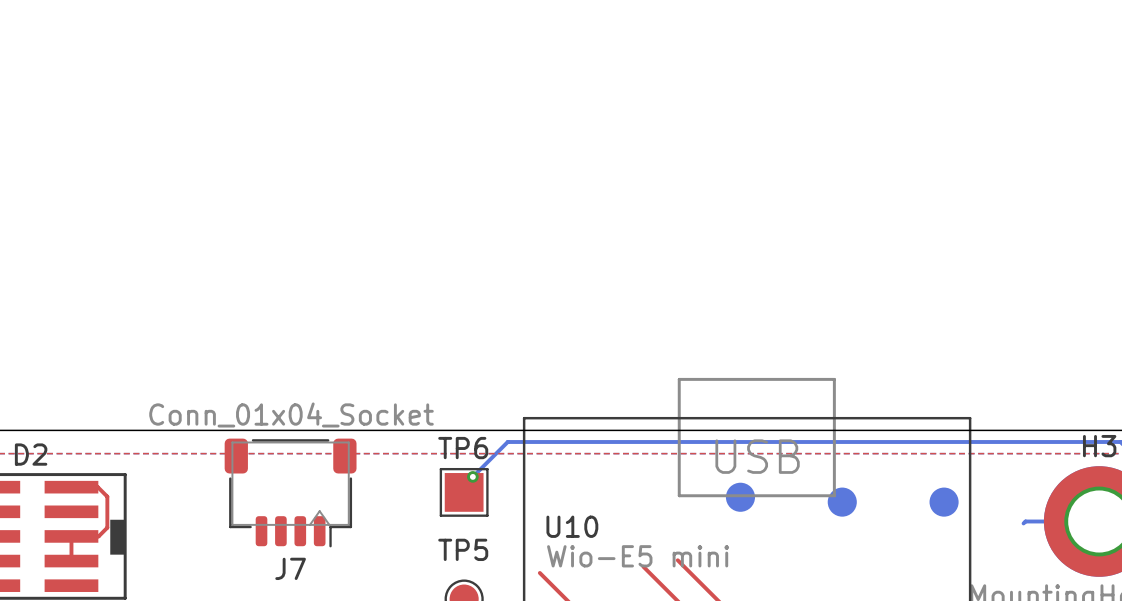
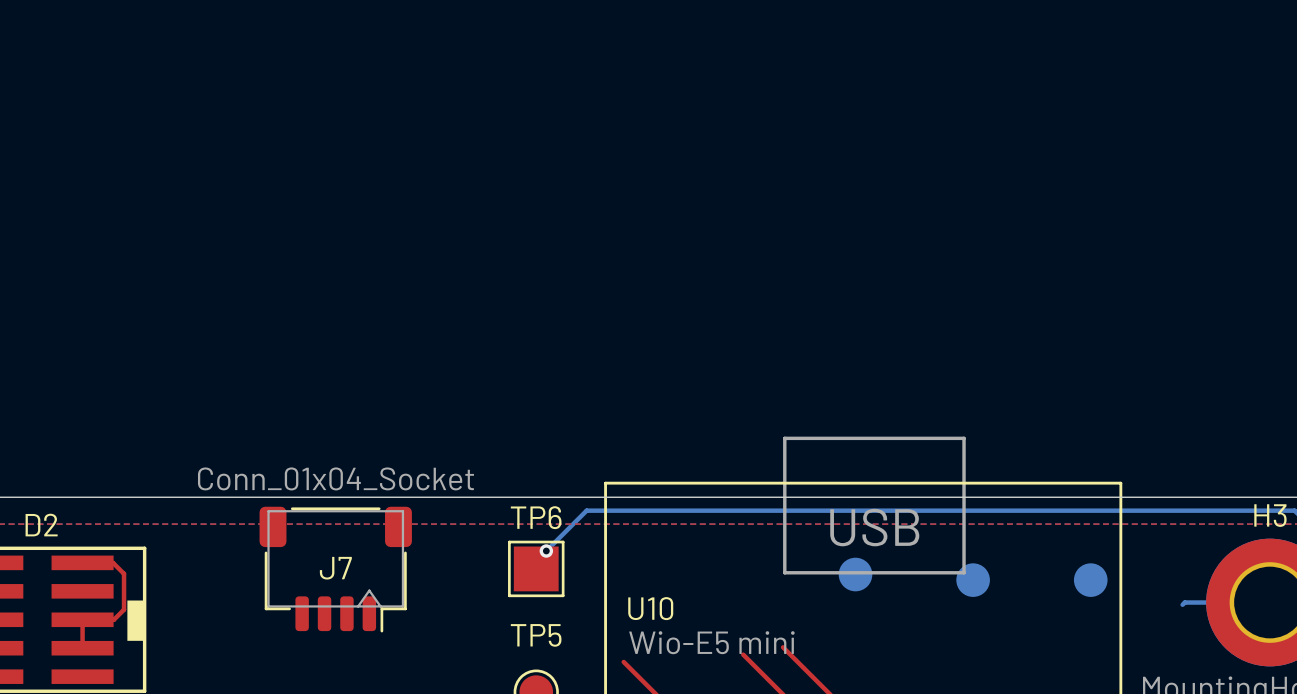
J7 name position: J7 (290, 568) -> J7 (335, 568)

